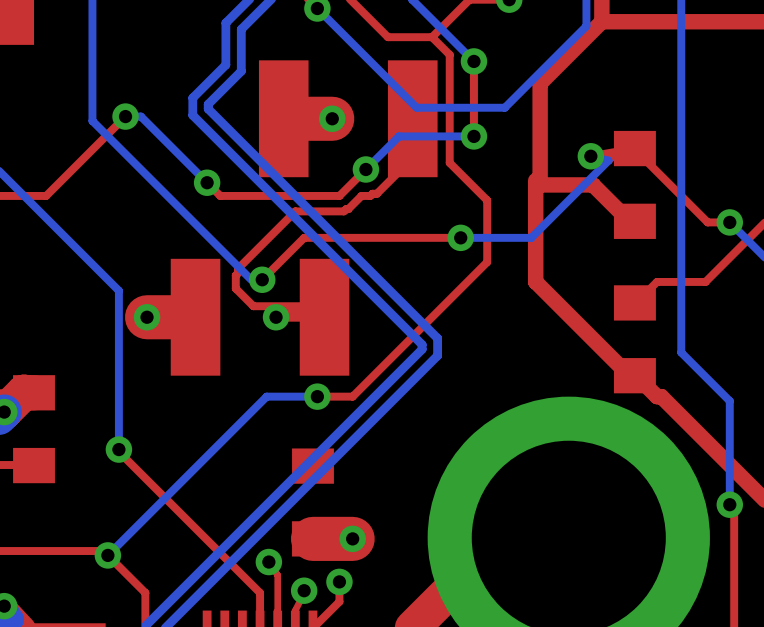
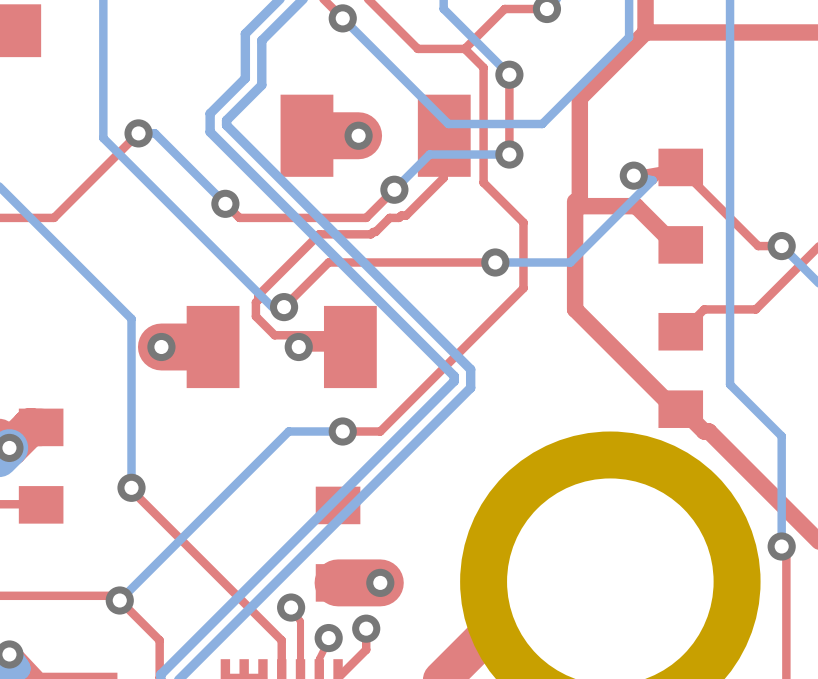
part footprint: [258, 60, 438, 178] -> [280, 94, 471, 177]
part footprint: [170, 258, 350, 376] -> [186, 305, 377, 389]

